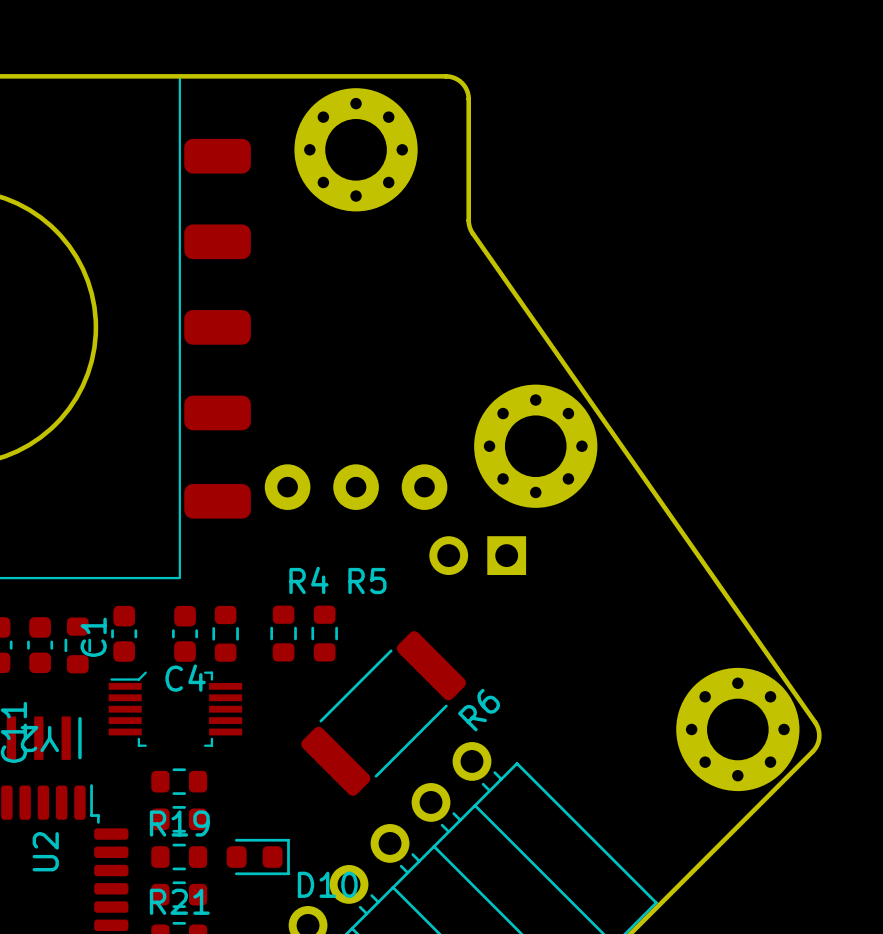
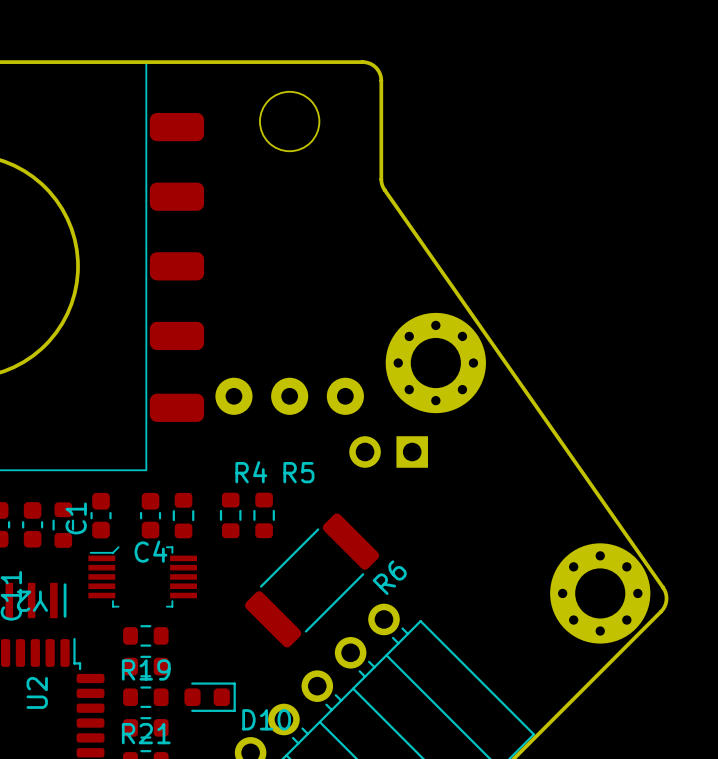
part: (356, 149) -> none

